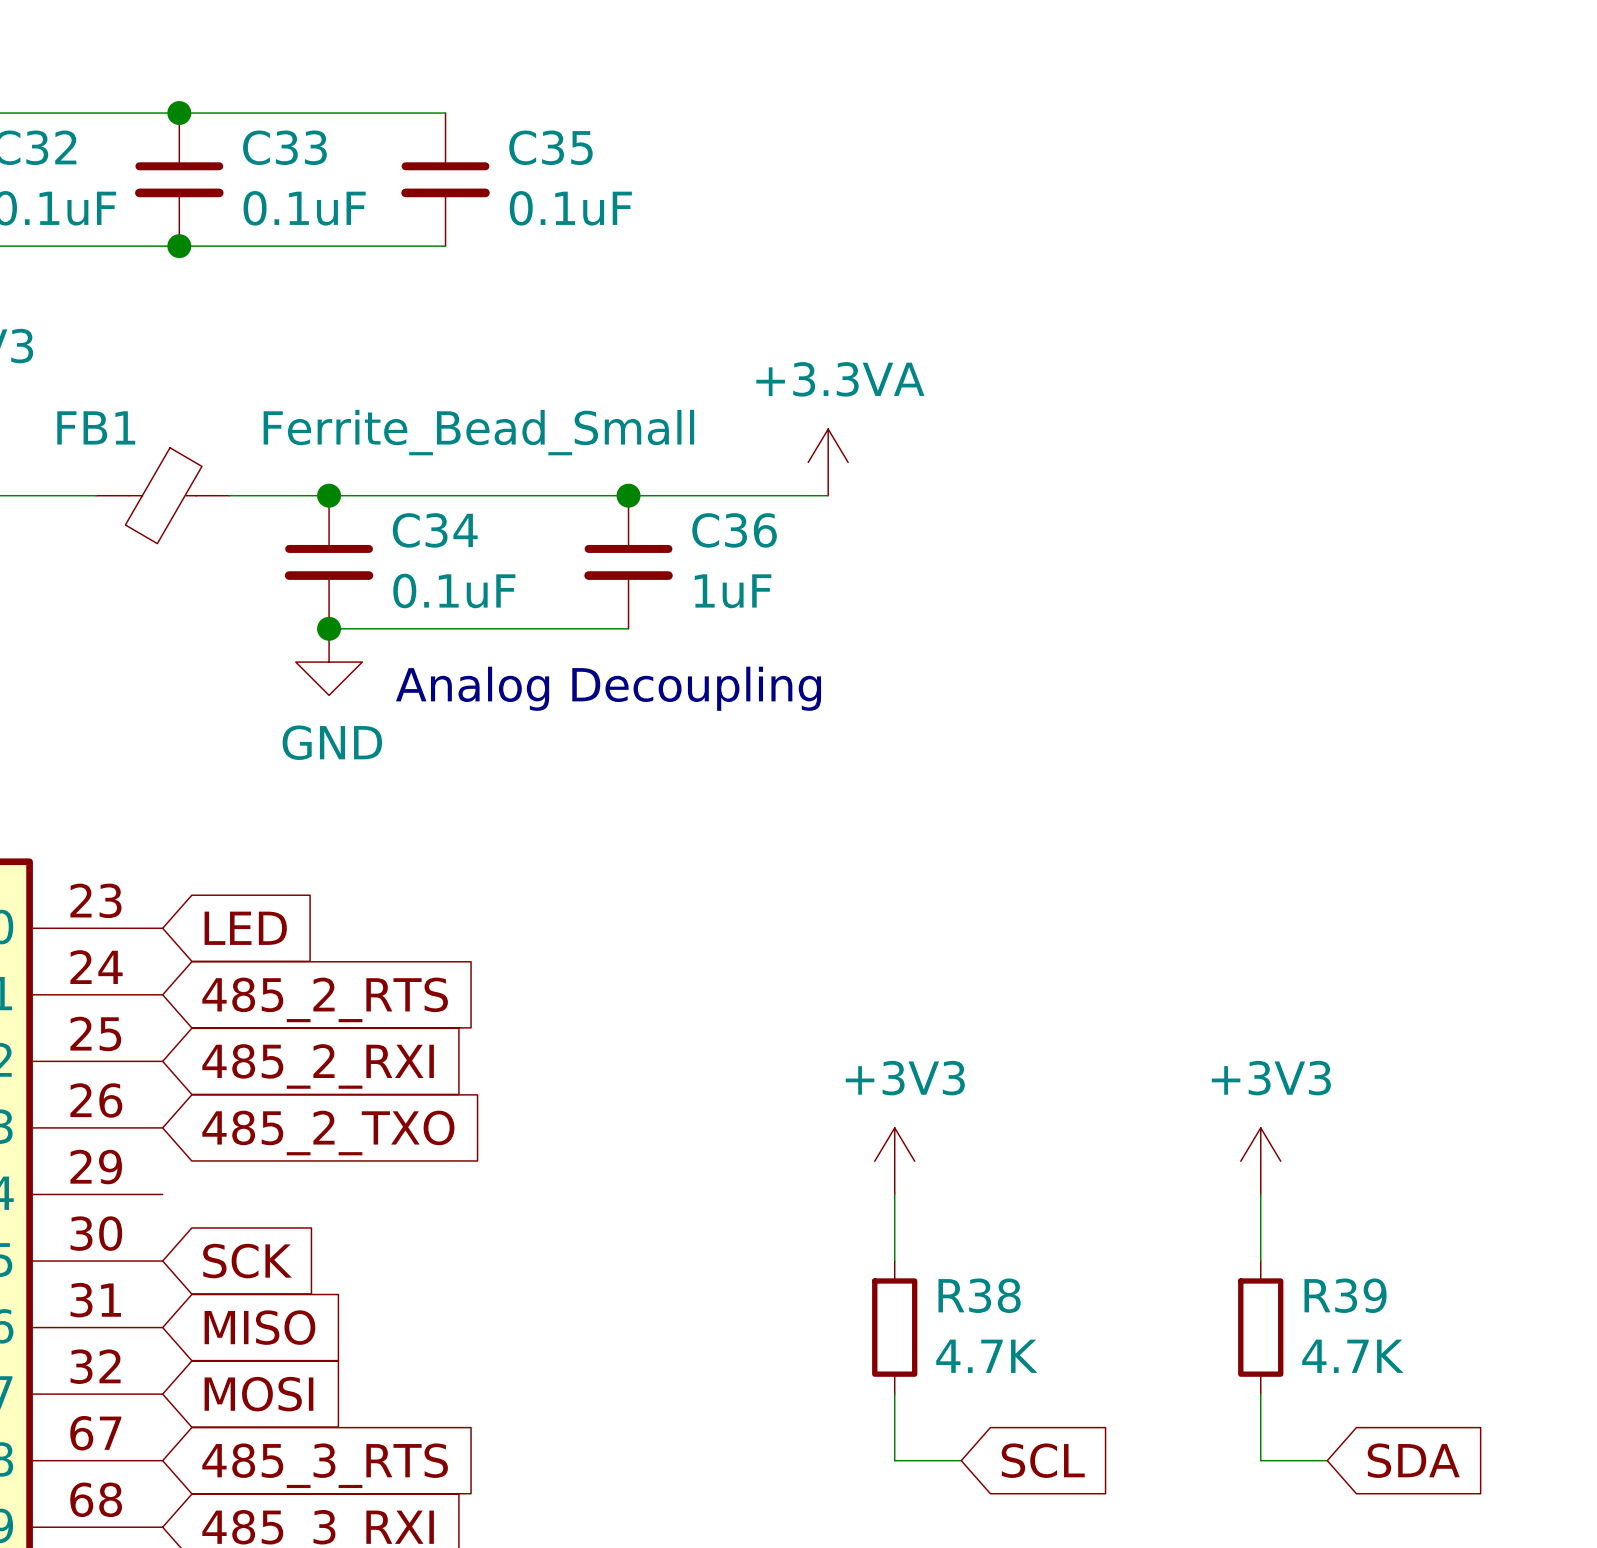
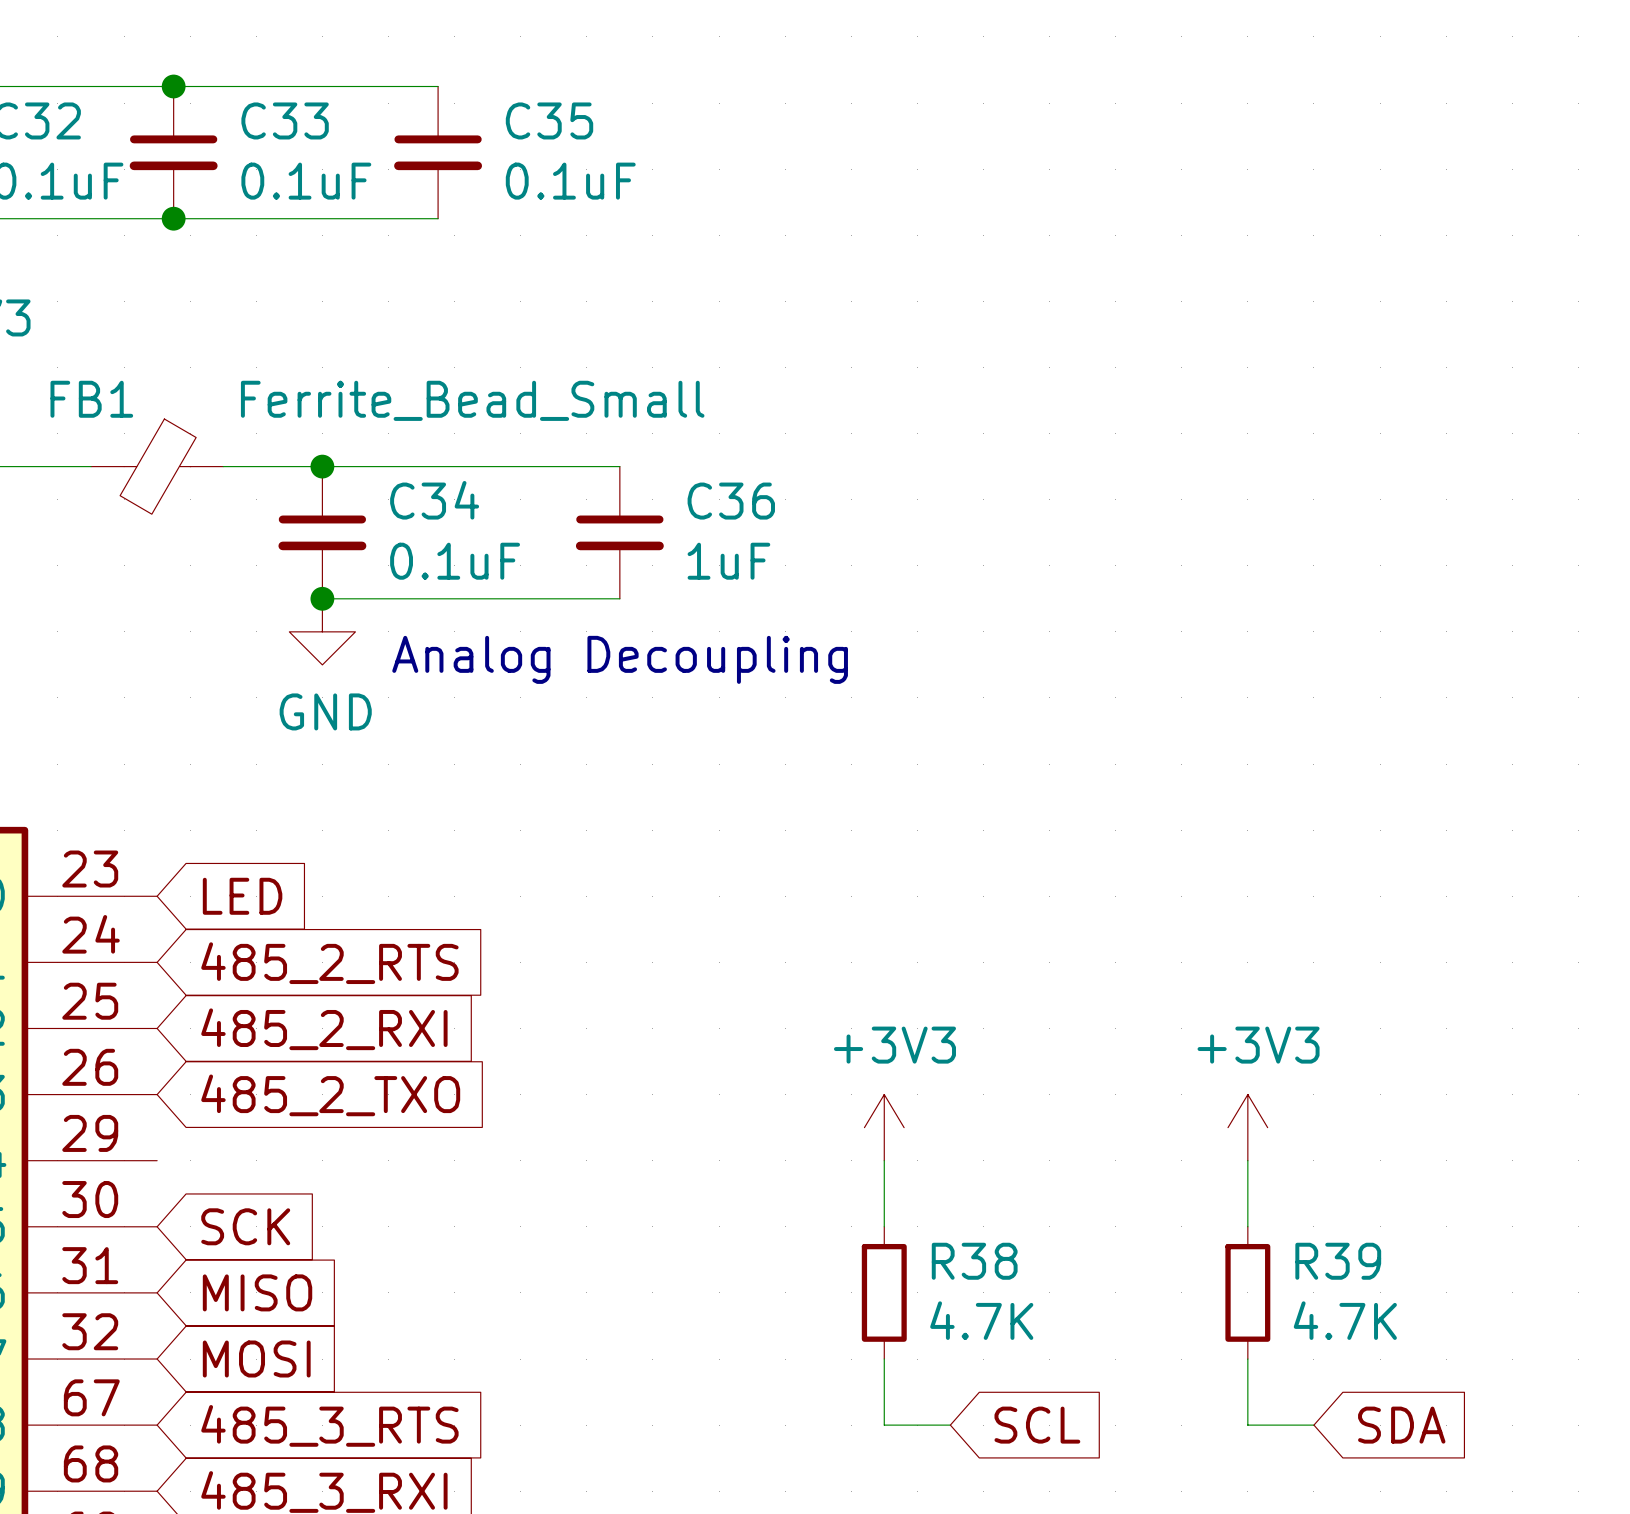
power symbol: +3.3VA (828, 462) -> none
wire: (628, 495) (828, 495) -> none
junction: (628, 495) -> none

